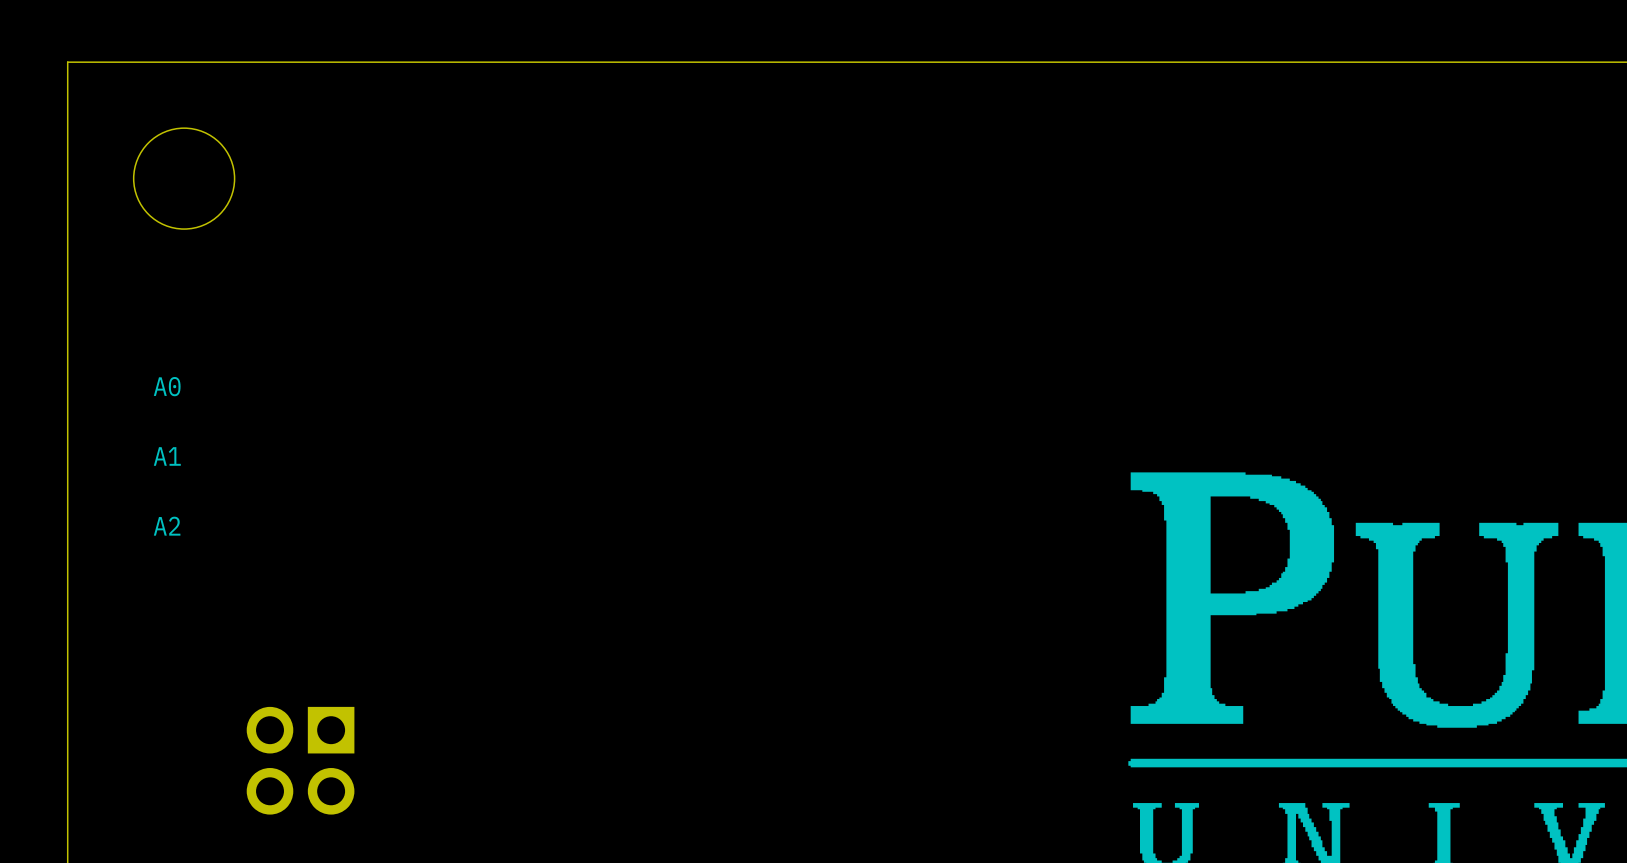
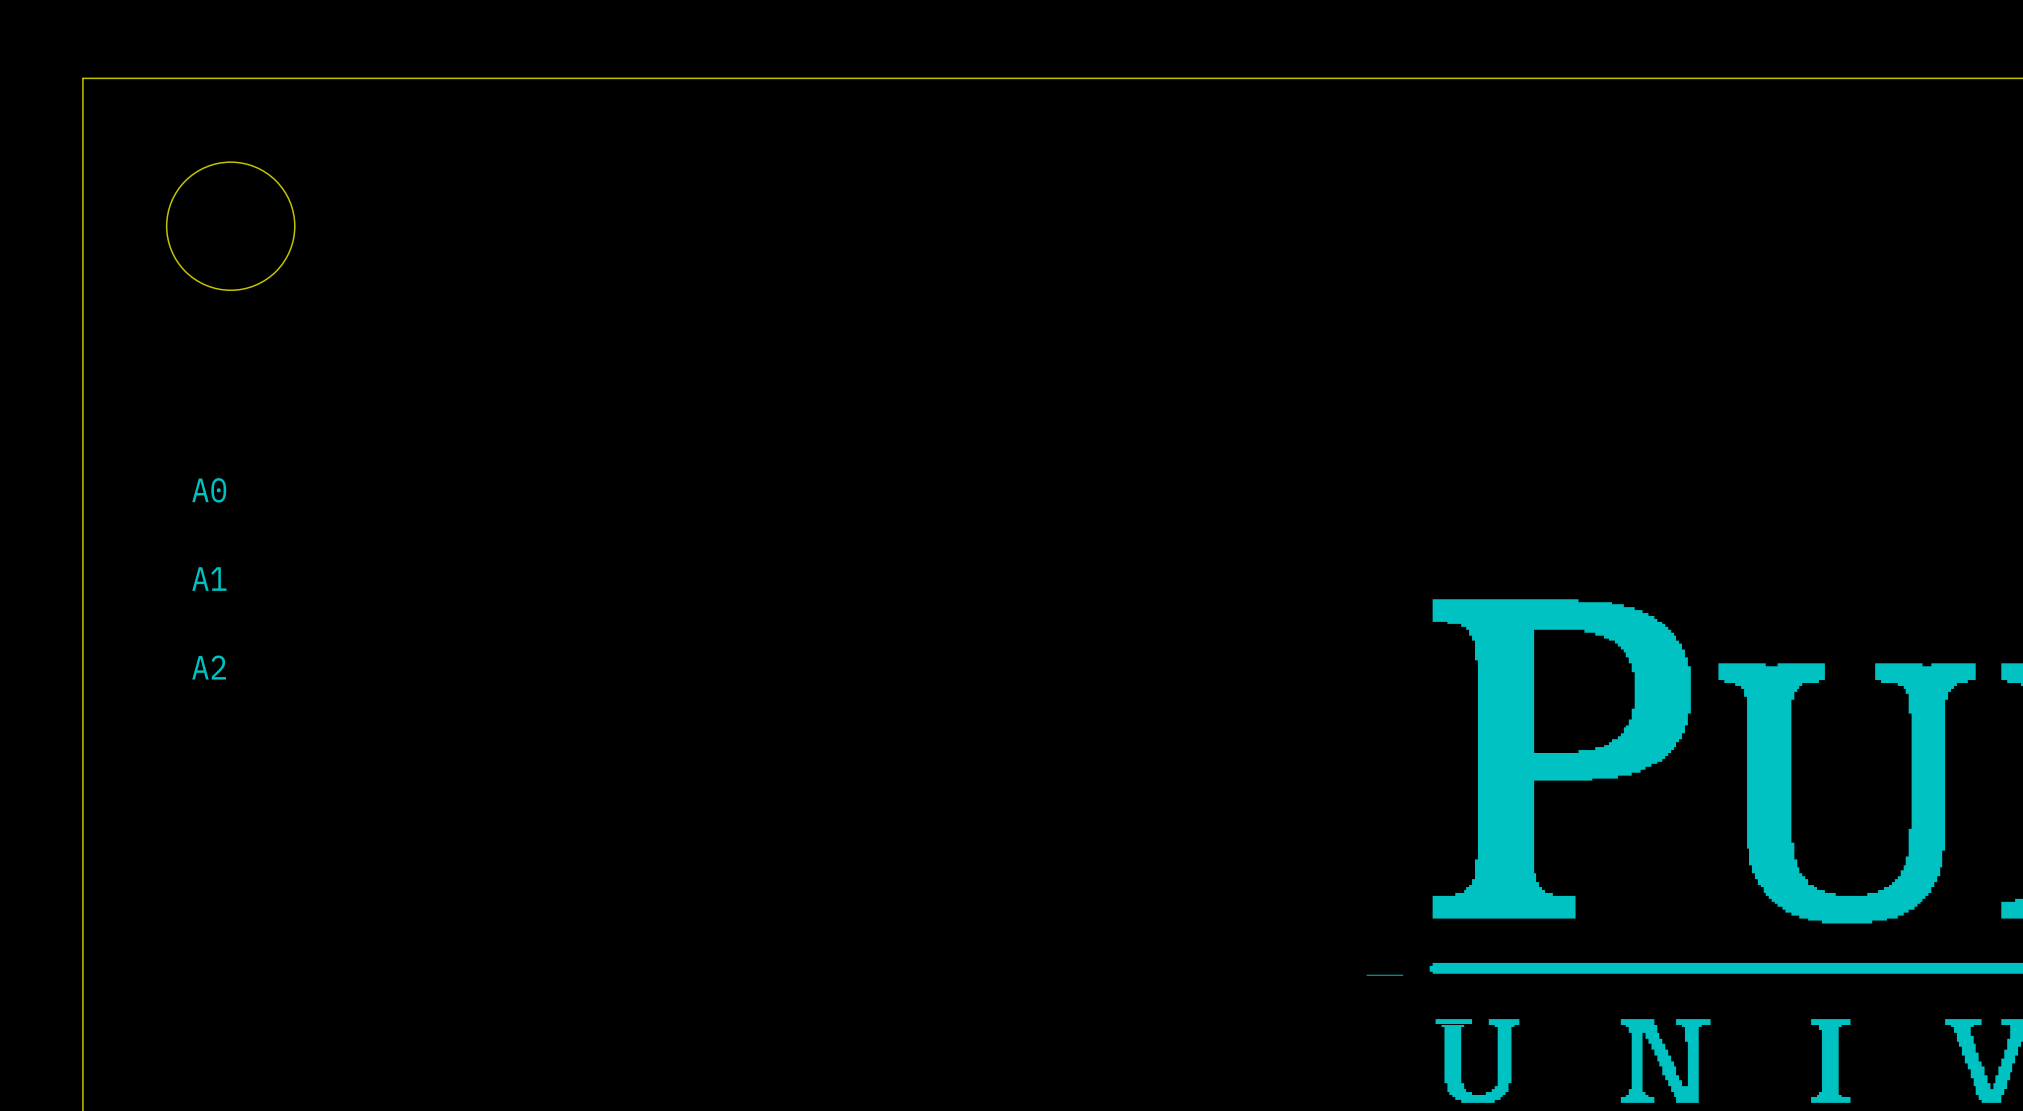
part: (300, 760) -> none
drawing position: (1147, 807) -> (1384, 975)

